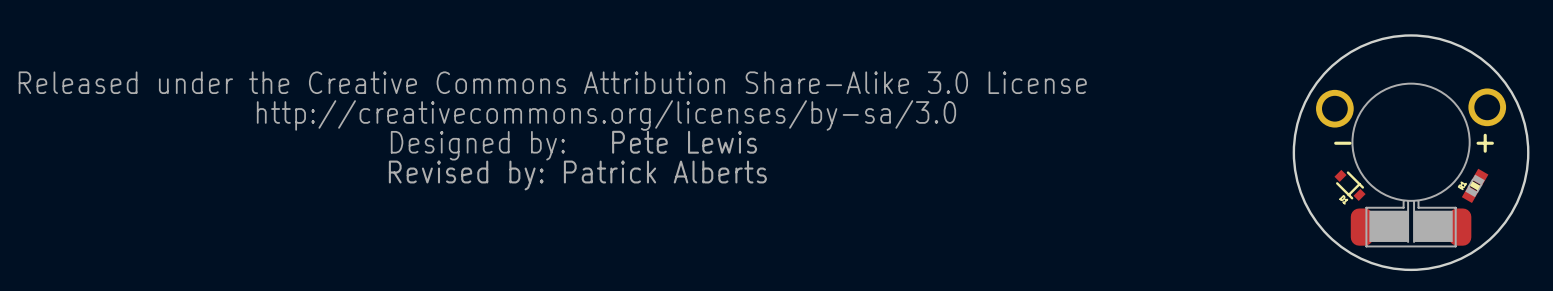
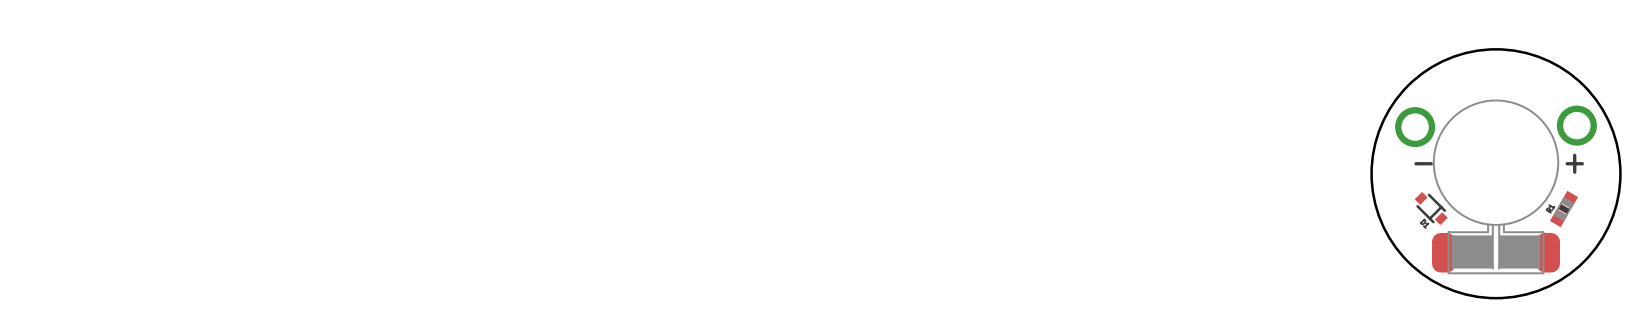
drawing: [18, 71, 1087, 161] -> none
text: Pete Lewis (684, 142) -> none
text: Revised by: Patrick Alberts (577, 175) -> none

